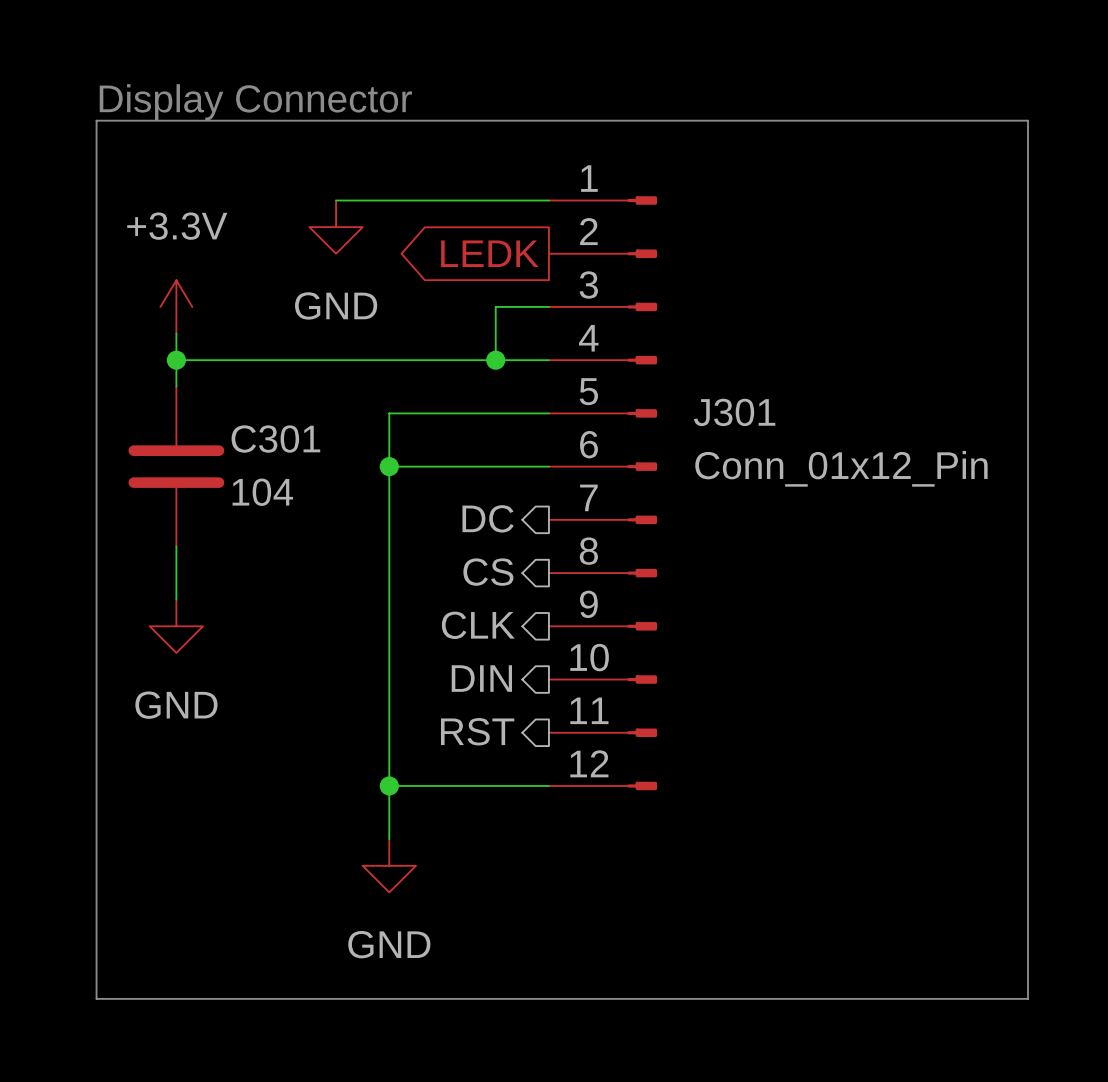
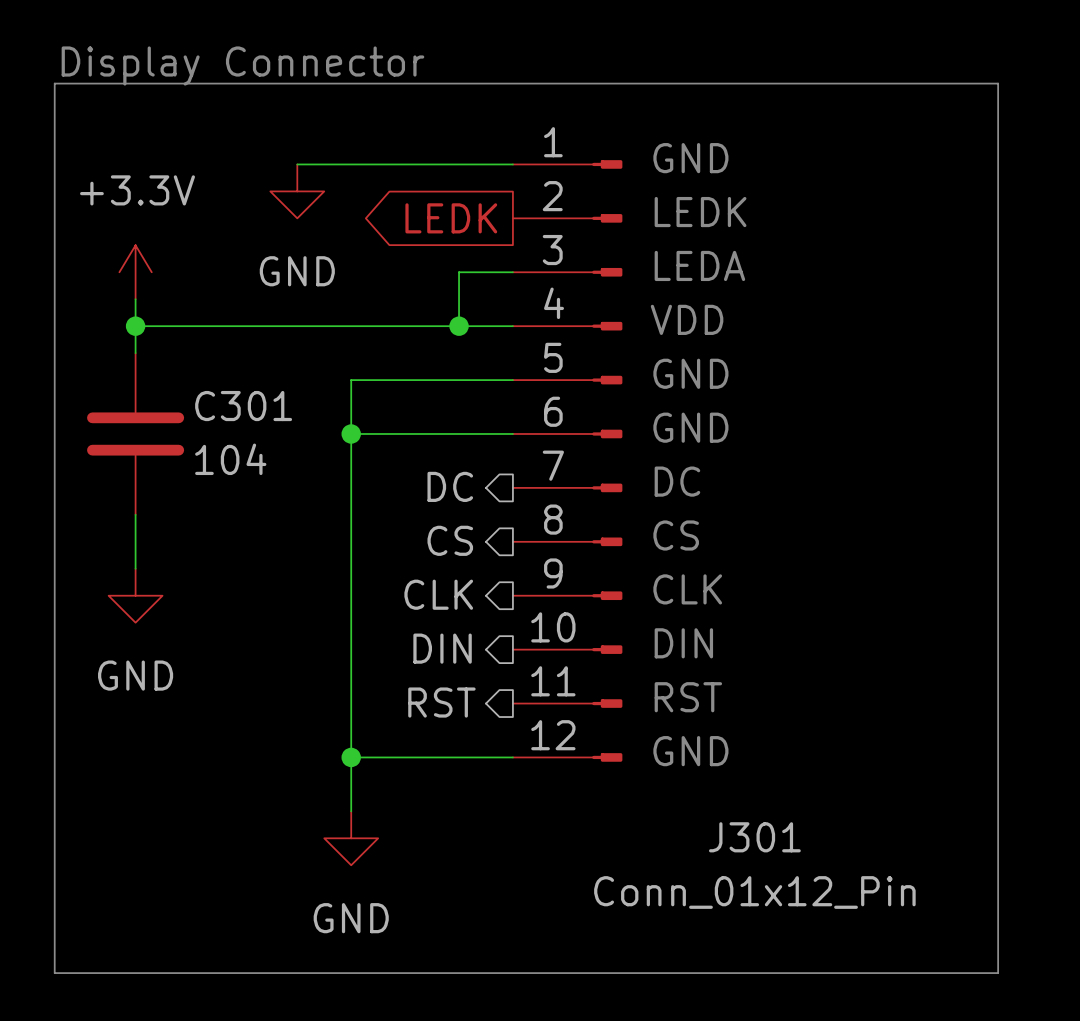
text: none -> GND (690, 158)
text: none -> LEDK (700, 212)
text: none -> LEDA (699, 265)
text: none -> VDD (687, 319)
text: none -> GND (690, 373)
J301 name position: J301 (734, 412) -> J301 (754, 837)
text: none -> GND (690, 427)
J301 value position: Conn_01x12_Pin (841, 468) -> Conn_01x12_Pin (754, 892)
text: none -> DC (677, 481)
text: none -> CS (676, 535)
text: none -> CLK (687, 589)
text: none -> DIN (683, 643)
text: none -> RST (688, 697)
text: none -> GND (690, 751)

